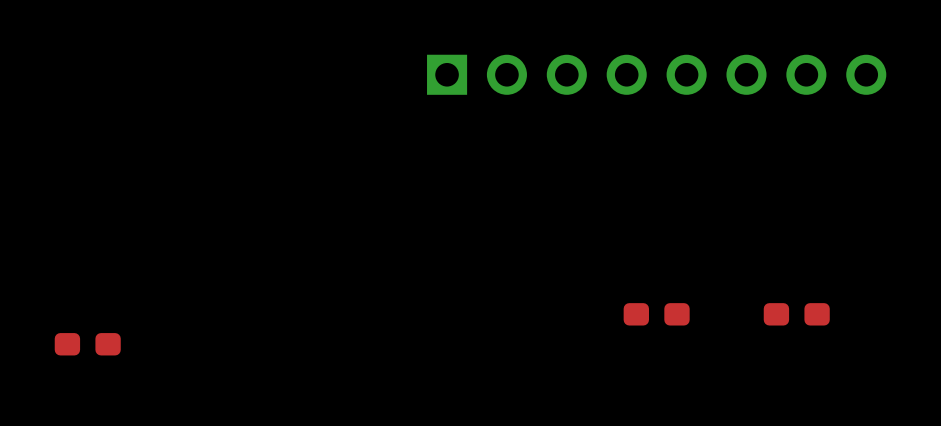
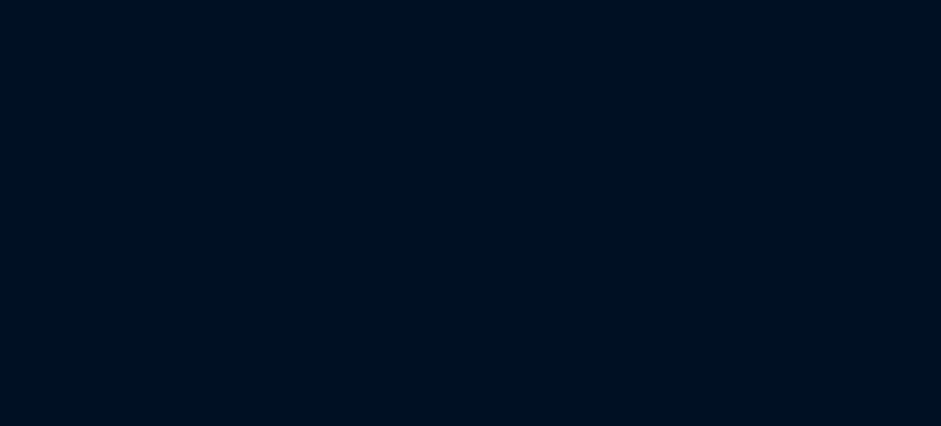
part: (656, 74) -> none
part: (656, 314) -> none
part: (796, 314) -> none
part: (87, 344) -> none

